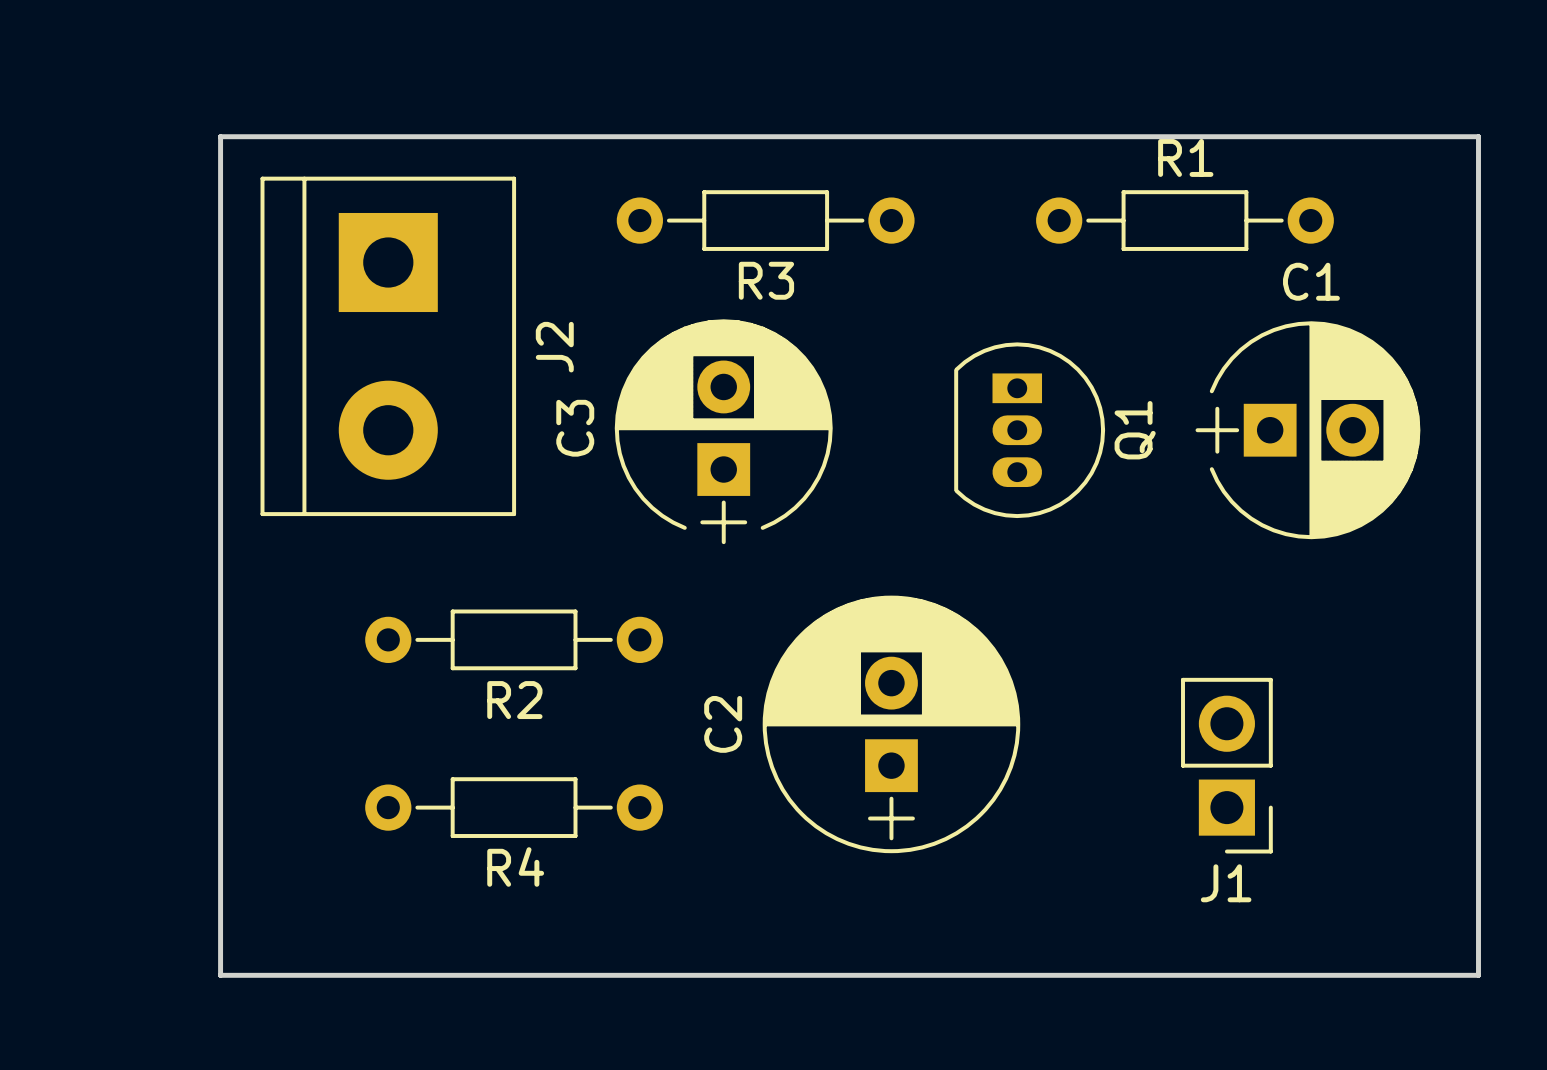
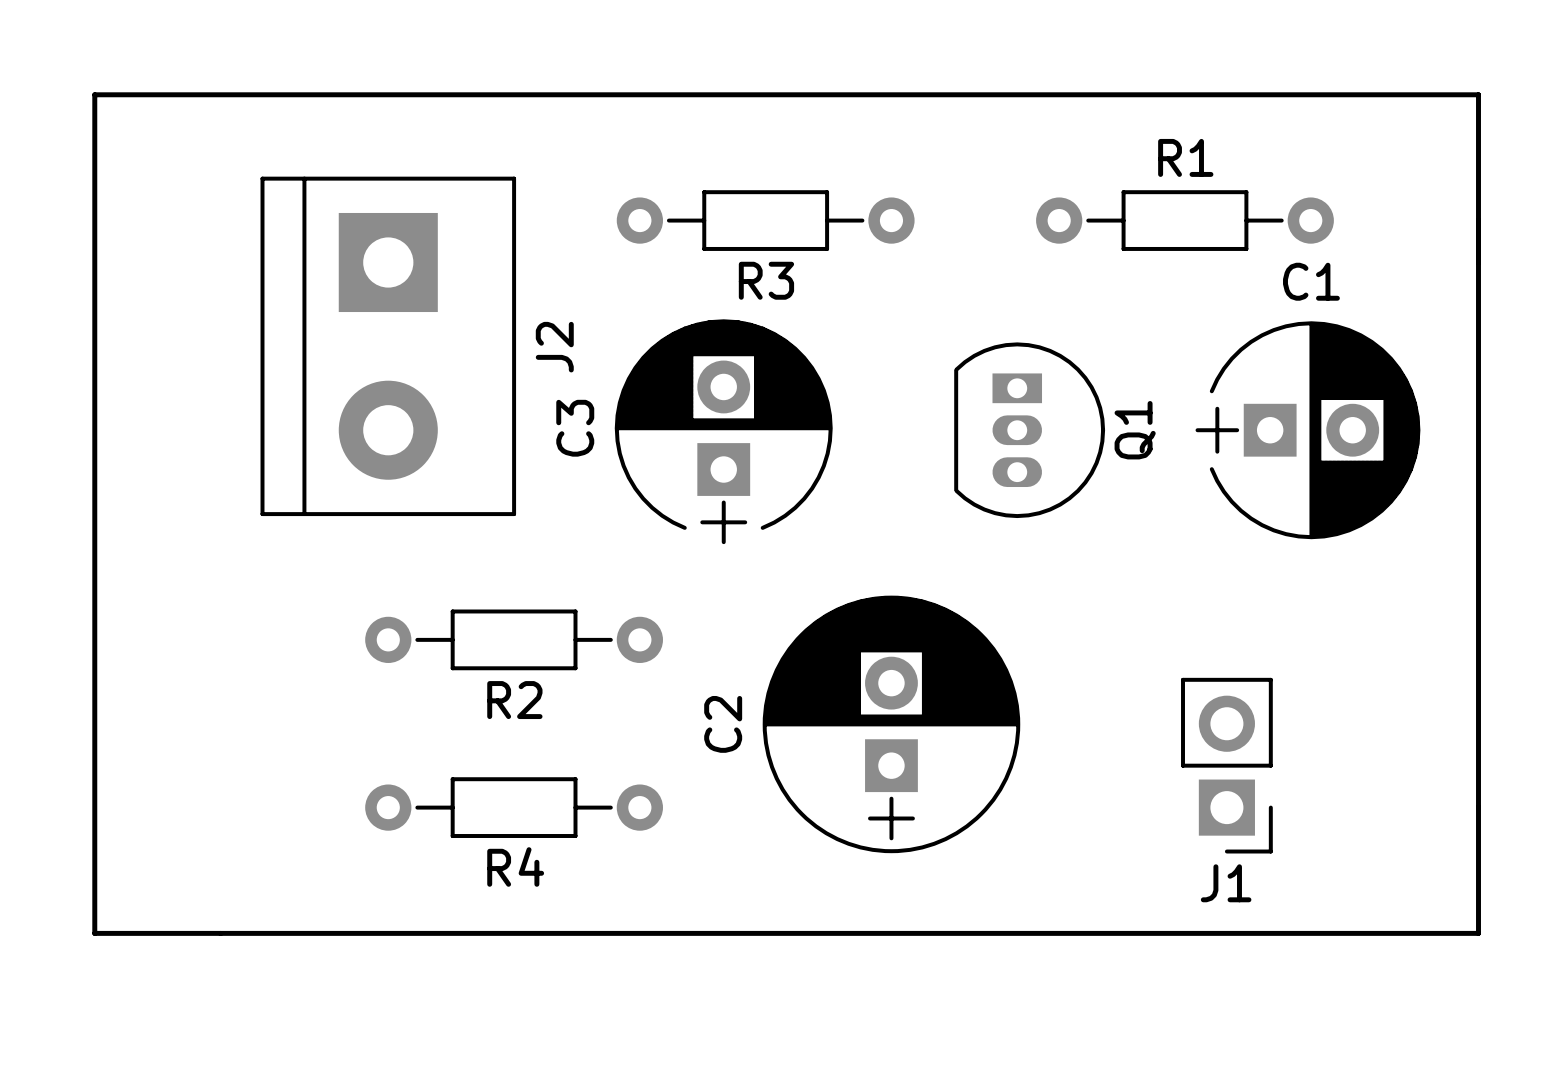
board edge: (1478, 136) (220, 136) (220, 975) (1478, 975) (1478, 933) -> (1478, 136) (1478, 94) (94, 94) (94, 933) (1478, 933)

